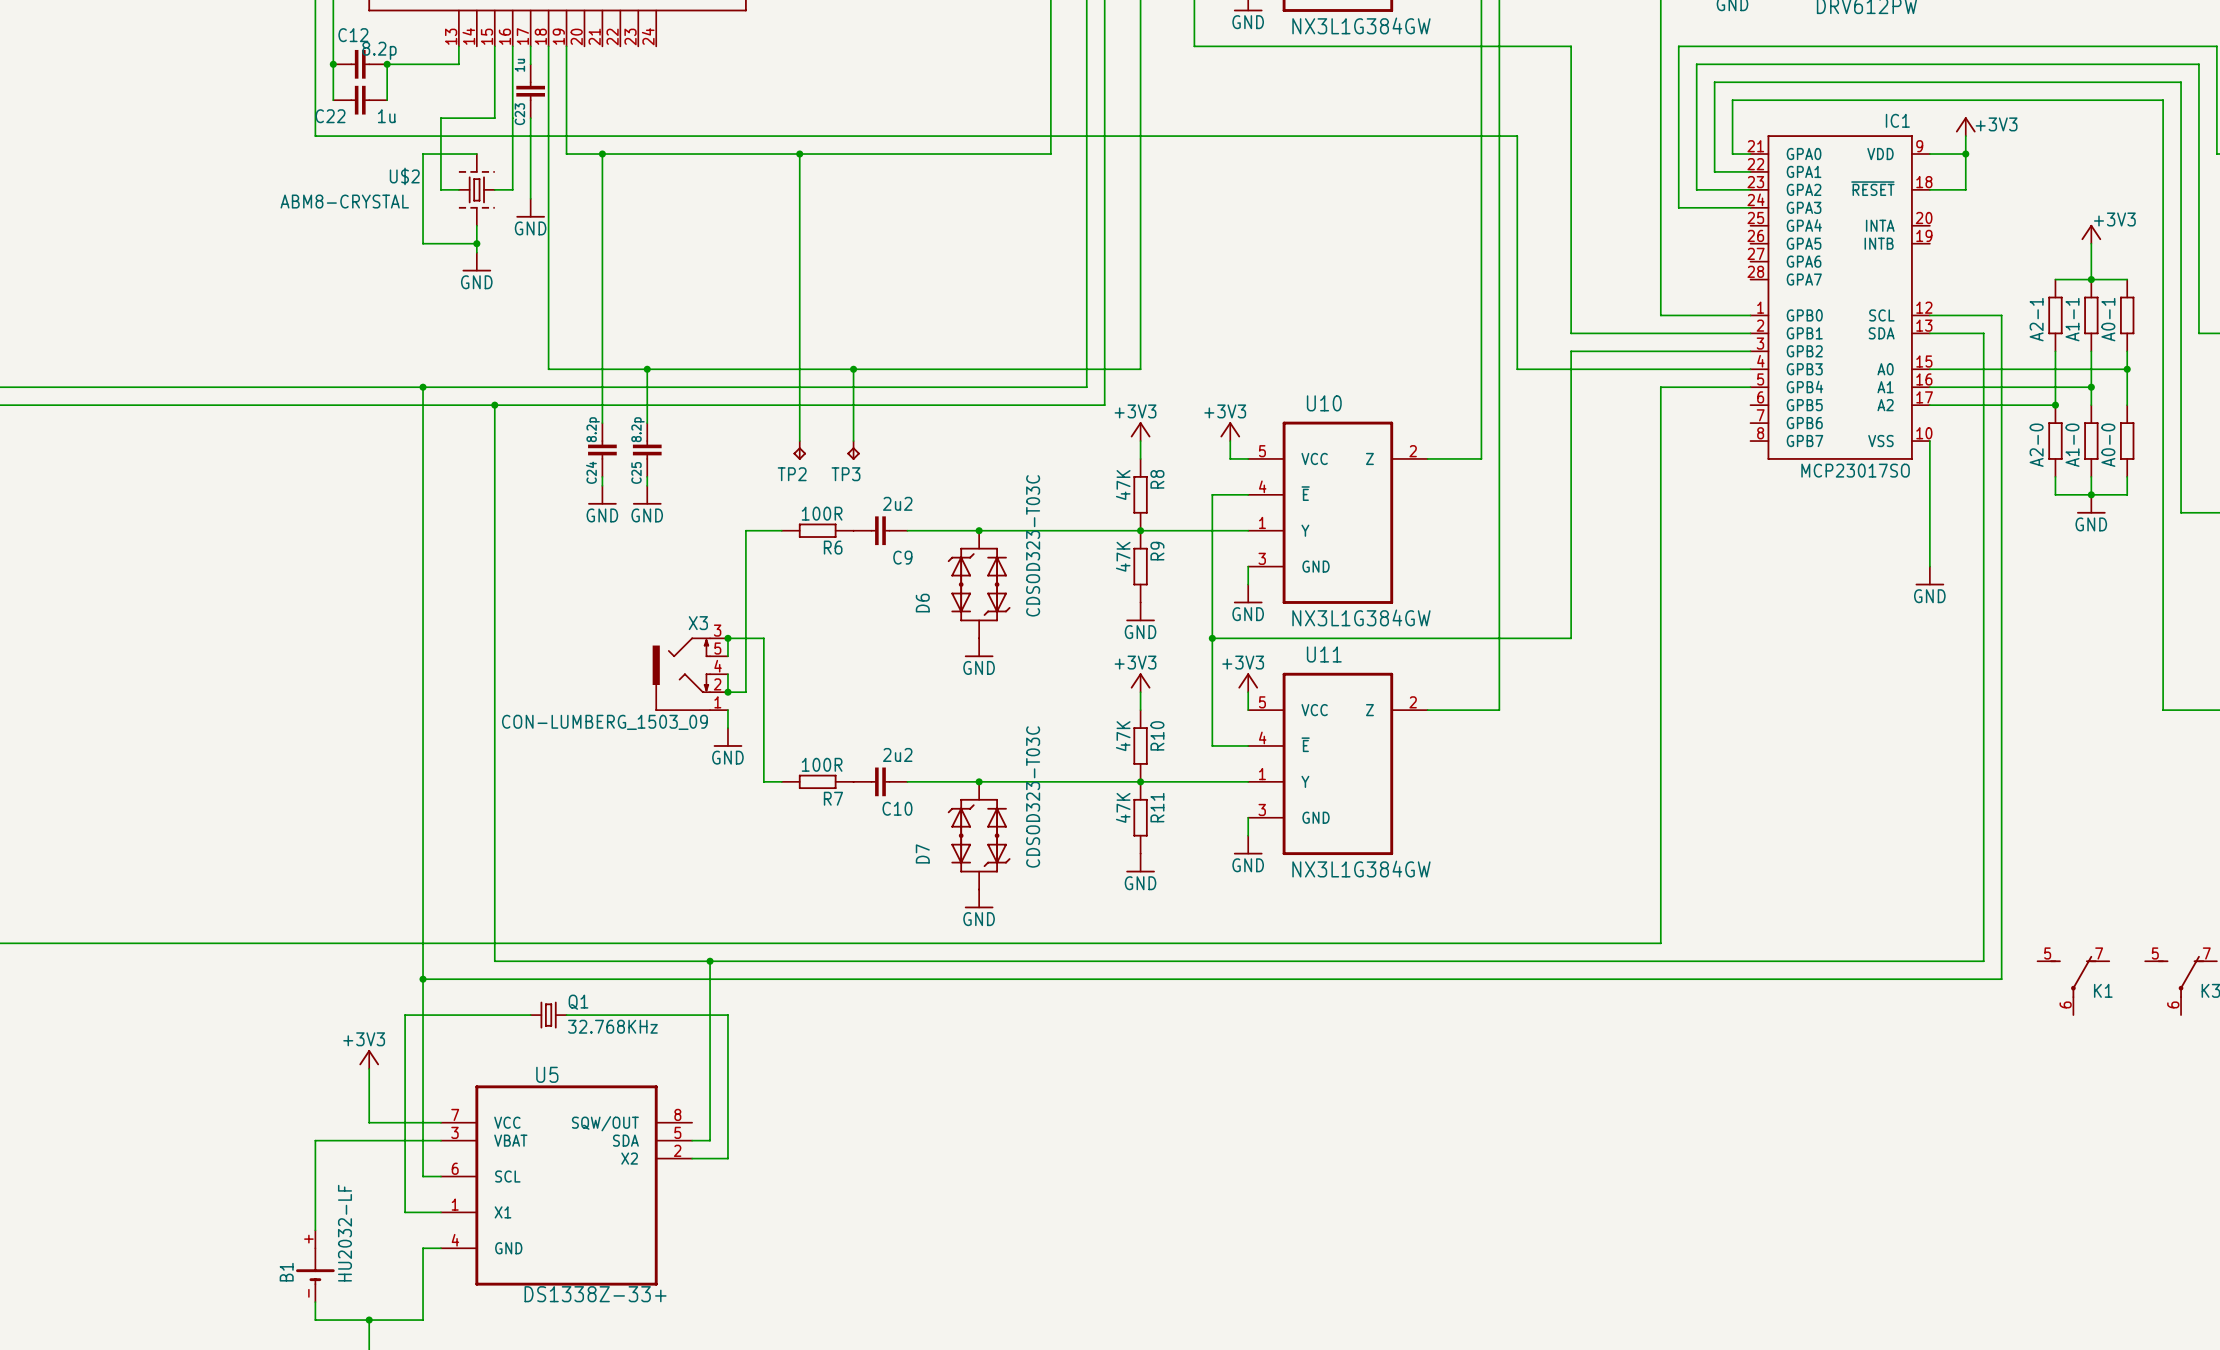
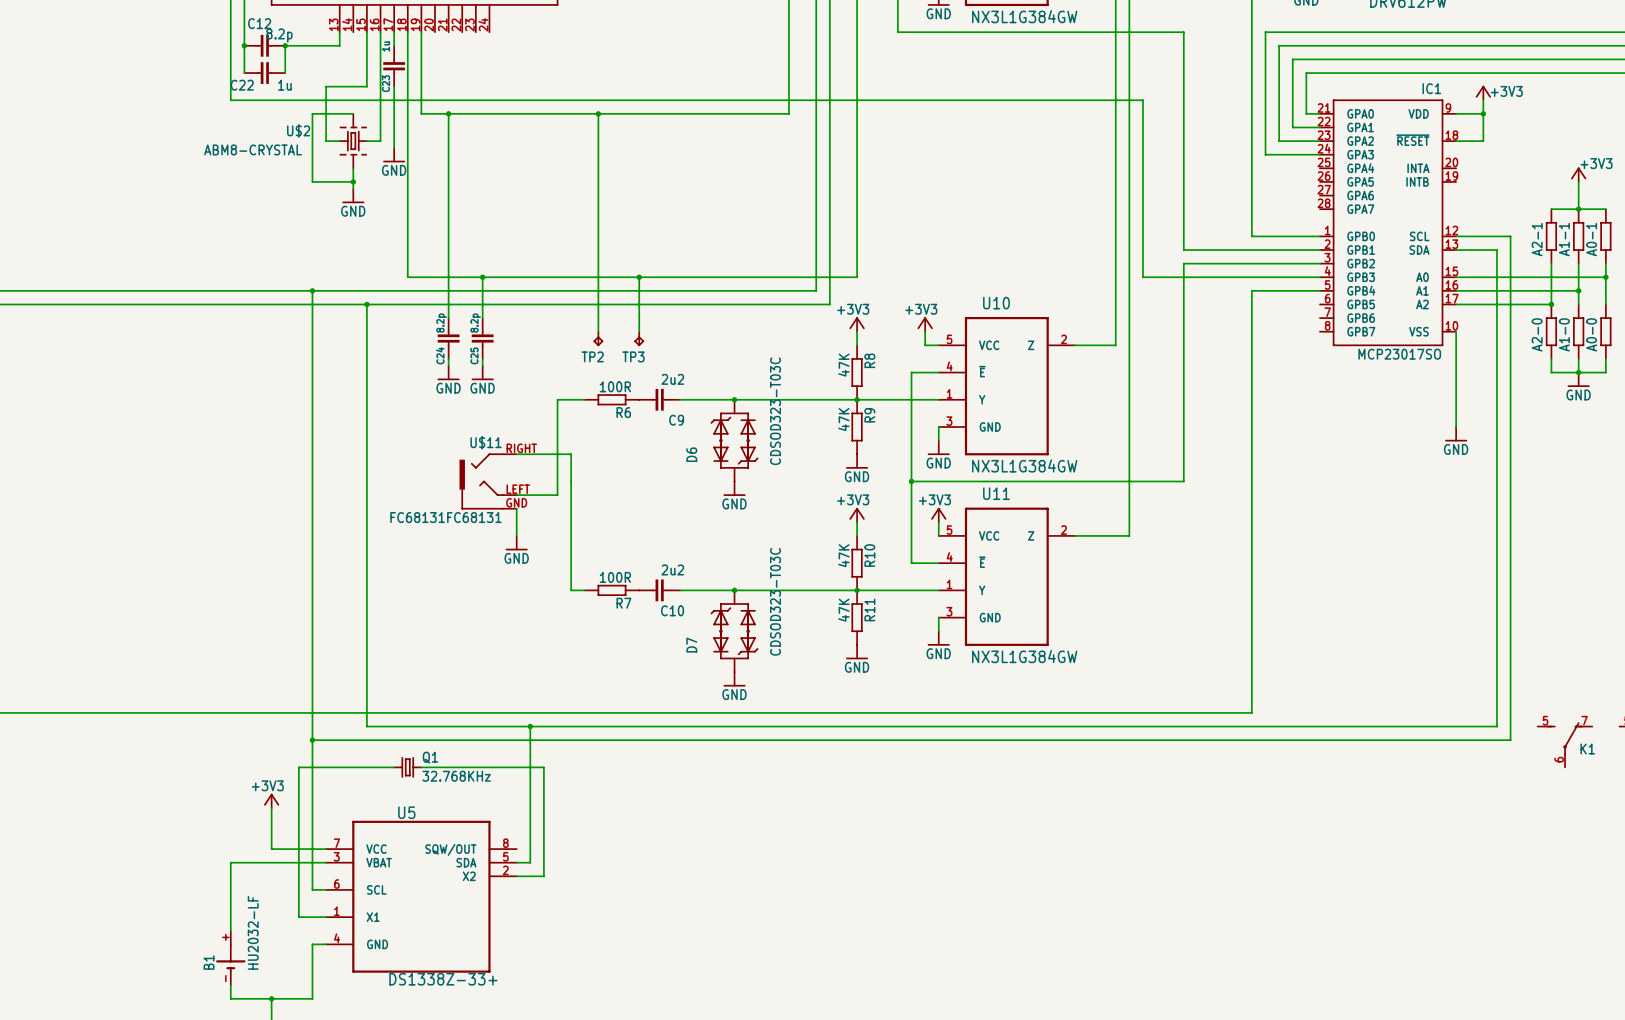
U$11: none -> FC68131FC68131 (488, 481)
junction: (727, 638) -> none
wire: (763, 638) (727, 638) (727, 656) -> (571, 481) (571, 454) (516, 454)
wire: (745, 656) (745, 692) (727, 692) (727, 674) -> (557, 495) (516, 495)
X3: CON-LUMBERG_1503_09 (690, 674) -> none
wire: none -> (516, 508) (516, 535)
junction: (727, 692) -> none
wire: (727, 710) (727, 728) -> none
power symbol position: GND (727, 737) -> GND (516, 543)

